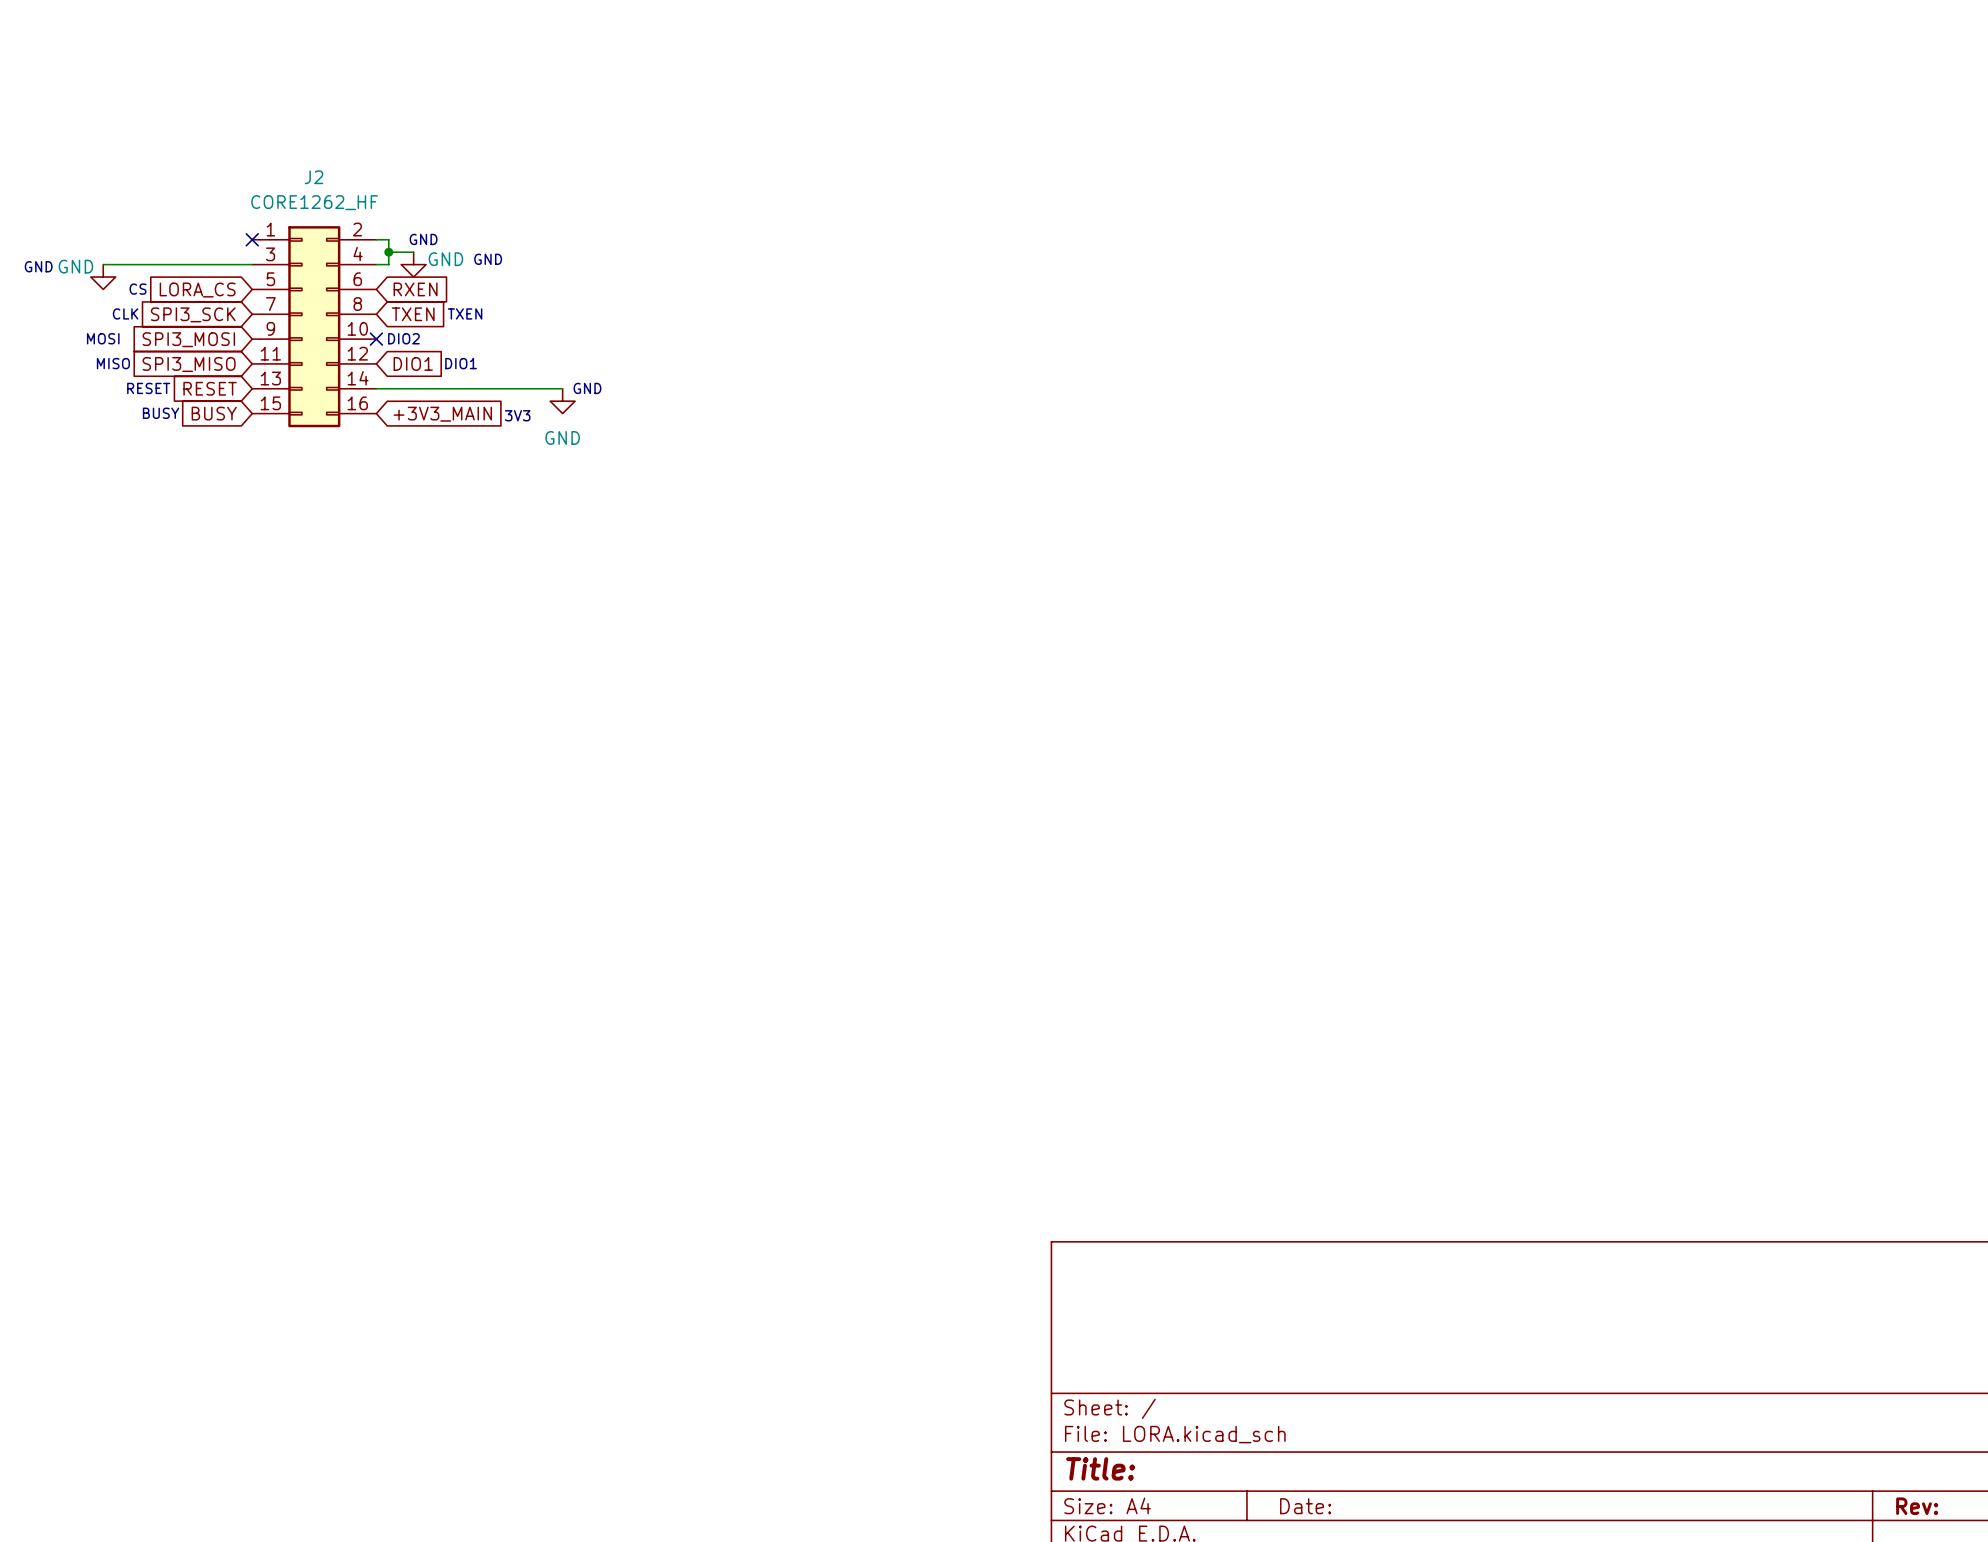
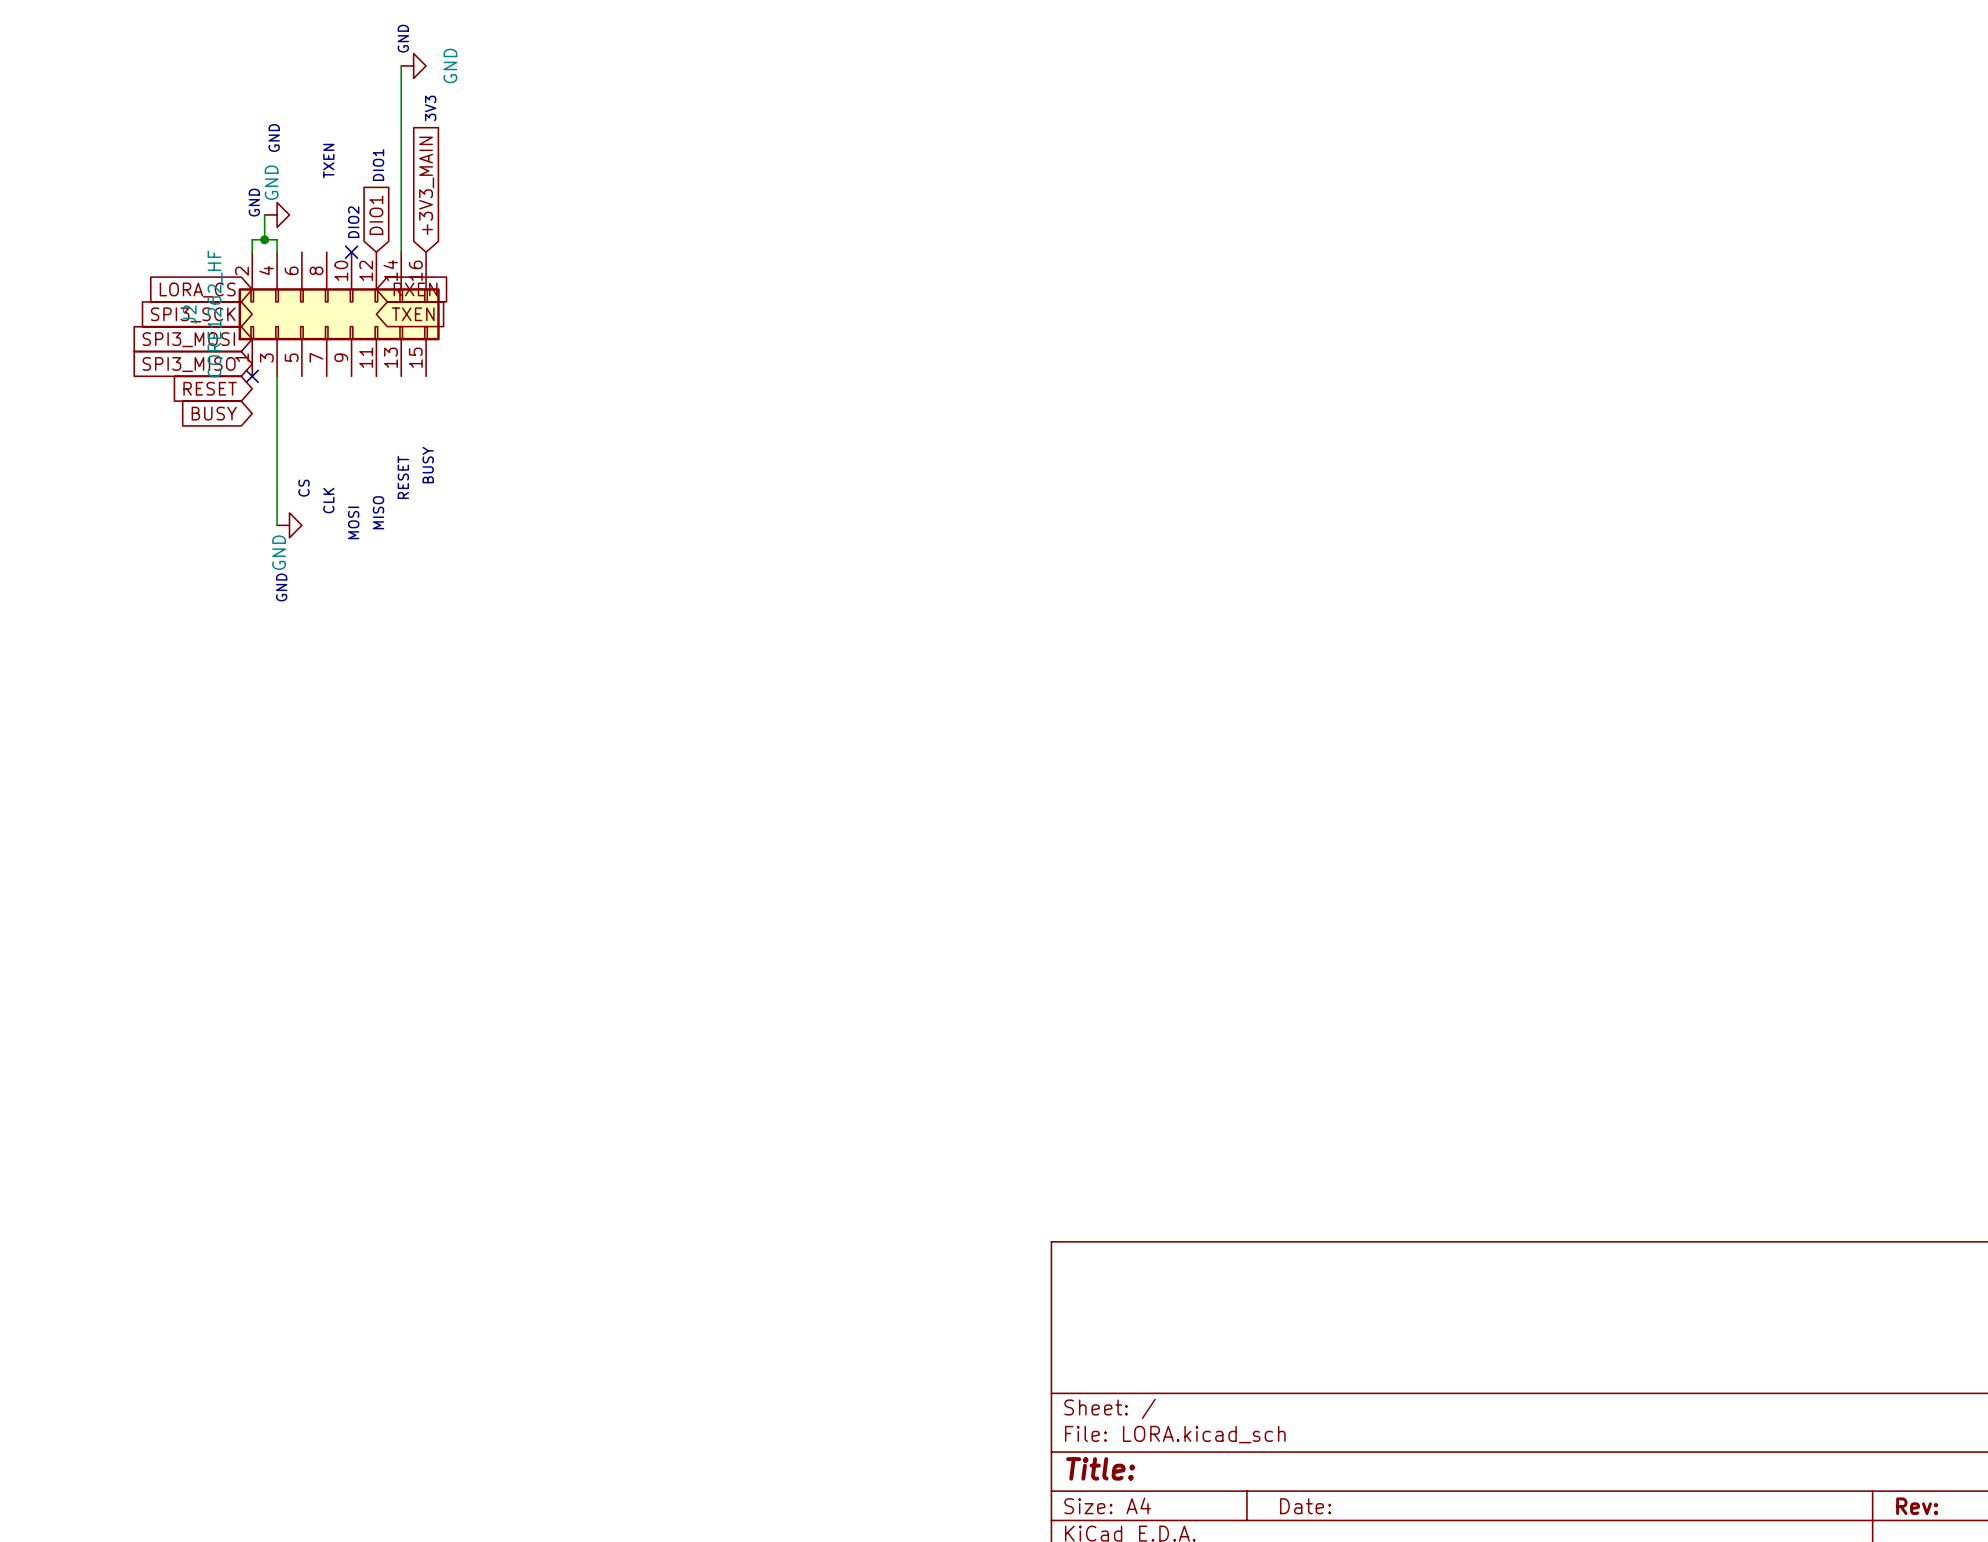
text: none -> GND (403, 38)
wire: none -> (401, 65) (401, 252)
power symbol: none -> GND (413, 65)
text: none -> 3V3 (430, 108)
text: none -> GND (274, 138)
text: none -> GND (254, 202)
wire: none -> (264, 214) (264, 239)
power symbol: none -> GND (277, 214)
no-connect mark: (252, 239) -> none
junction: none -> (264, 239)
wire: (376, 239) (388, 239) (388, 264) (376, 264) -> none
text: GND (423, 239) -> none
no-connect mark: none -> (351, 252)
wire: (388, 252) (413, 252) -> none
junction: (388, 252) -> none
text: GND (488, 259) -> none
wire: (103, 264) (252, 264) -> none
power symbol: GND (413, 264) -> none
text: GND (38, 266) -> none
power symbol: GND (103, 277) -> none
text: CS (138, 289) -> none
text: CLK (125, 313) -> none
text rotation: 0° (465, 313) -> 90° counterclockwise (328, 161)
text position: TXEN (465, 313) -> TXEN (328, 161)
J2 rotation: 0° (314, 326) -> 90° counterclockwise (339, 314)
text: MOSI (103, 338) -> none
text rotation: 0° (403, 338) -> 90° counterclockwise (353, 222)
text position: DIO2 (403, 338) -> DIO2 (353, 222)
no-connect mark: (376, 339) -> none
text: MISO (113, 363) -> none
global label rotation: 0° (413, 363) -> 90° counterclockwise (376, 215)
global label position: DIO1 (413, 363) -> DIO1 (376, 215)
text rotation: 0° (461, 363) -> 90° counterclockwise (378, 165)
text position: DIO1 (461, 363) -> DIO1 (378, 165)
no-connect mark: none -> (252, 376)
wire: none -> (277, 376) (277, 525)
text: RESET (148, 388) -> none
wire: (376, 388) (562, 388) -> none
text: GND (587, 388) -> none
power symbol: GND (562, 401) -> none
text: BUSY (161, 413) -> none
global label rotation: 0° (442, 414) -> 90° counterclockwise (426, 185)
global label position: +3V3_MAIN (442, 414) -> +3V3_MAIN (426, 185)
text: 3V3 (517, 415) -> none
text: none -> BUSY (428, 465)
text: none -> RESET (403, 477)
text: none -> CS (304, 488)
text: none -> CLK (328, 500)
text: none -> MISO (378, 512)
text: none -> MOSI (353, 522)
power symbol: none -> GND (289, 525)
text: none -> GND (281, 587)

